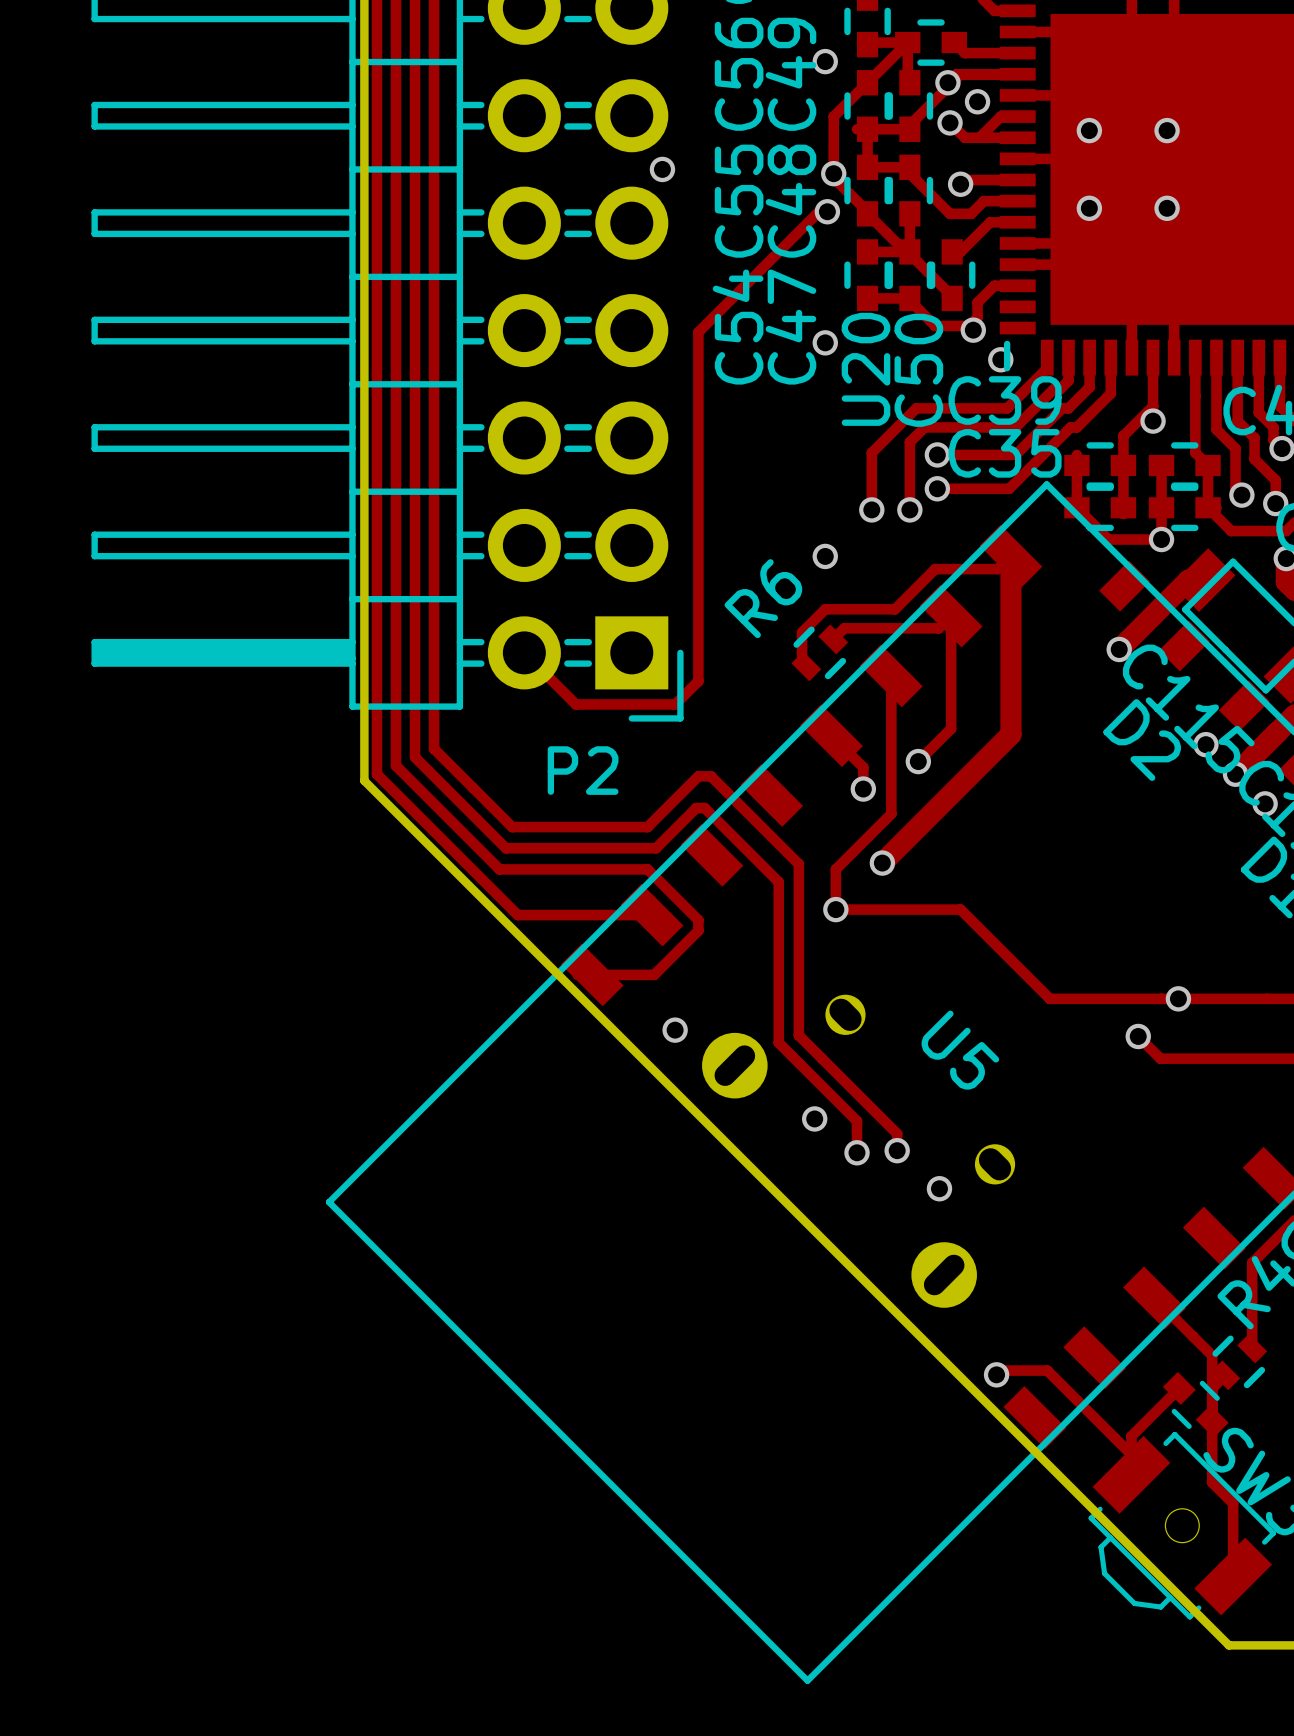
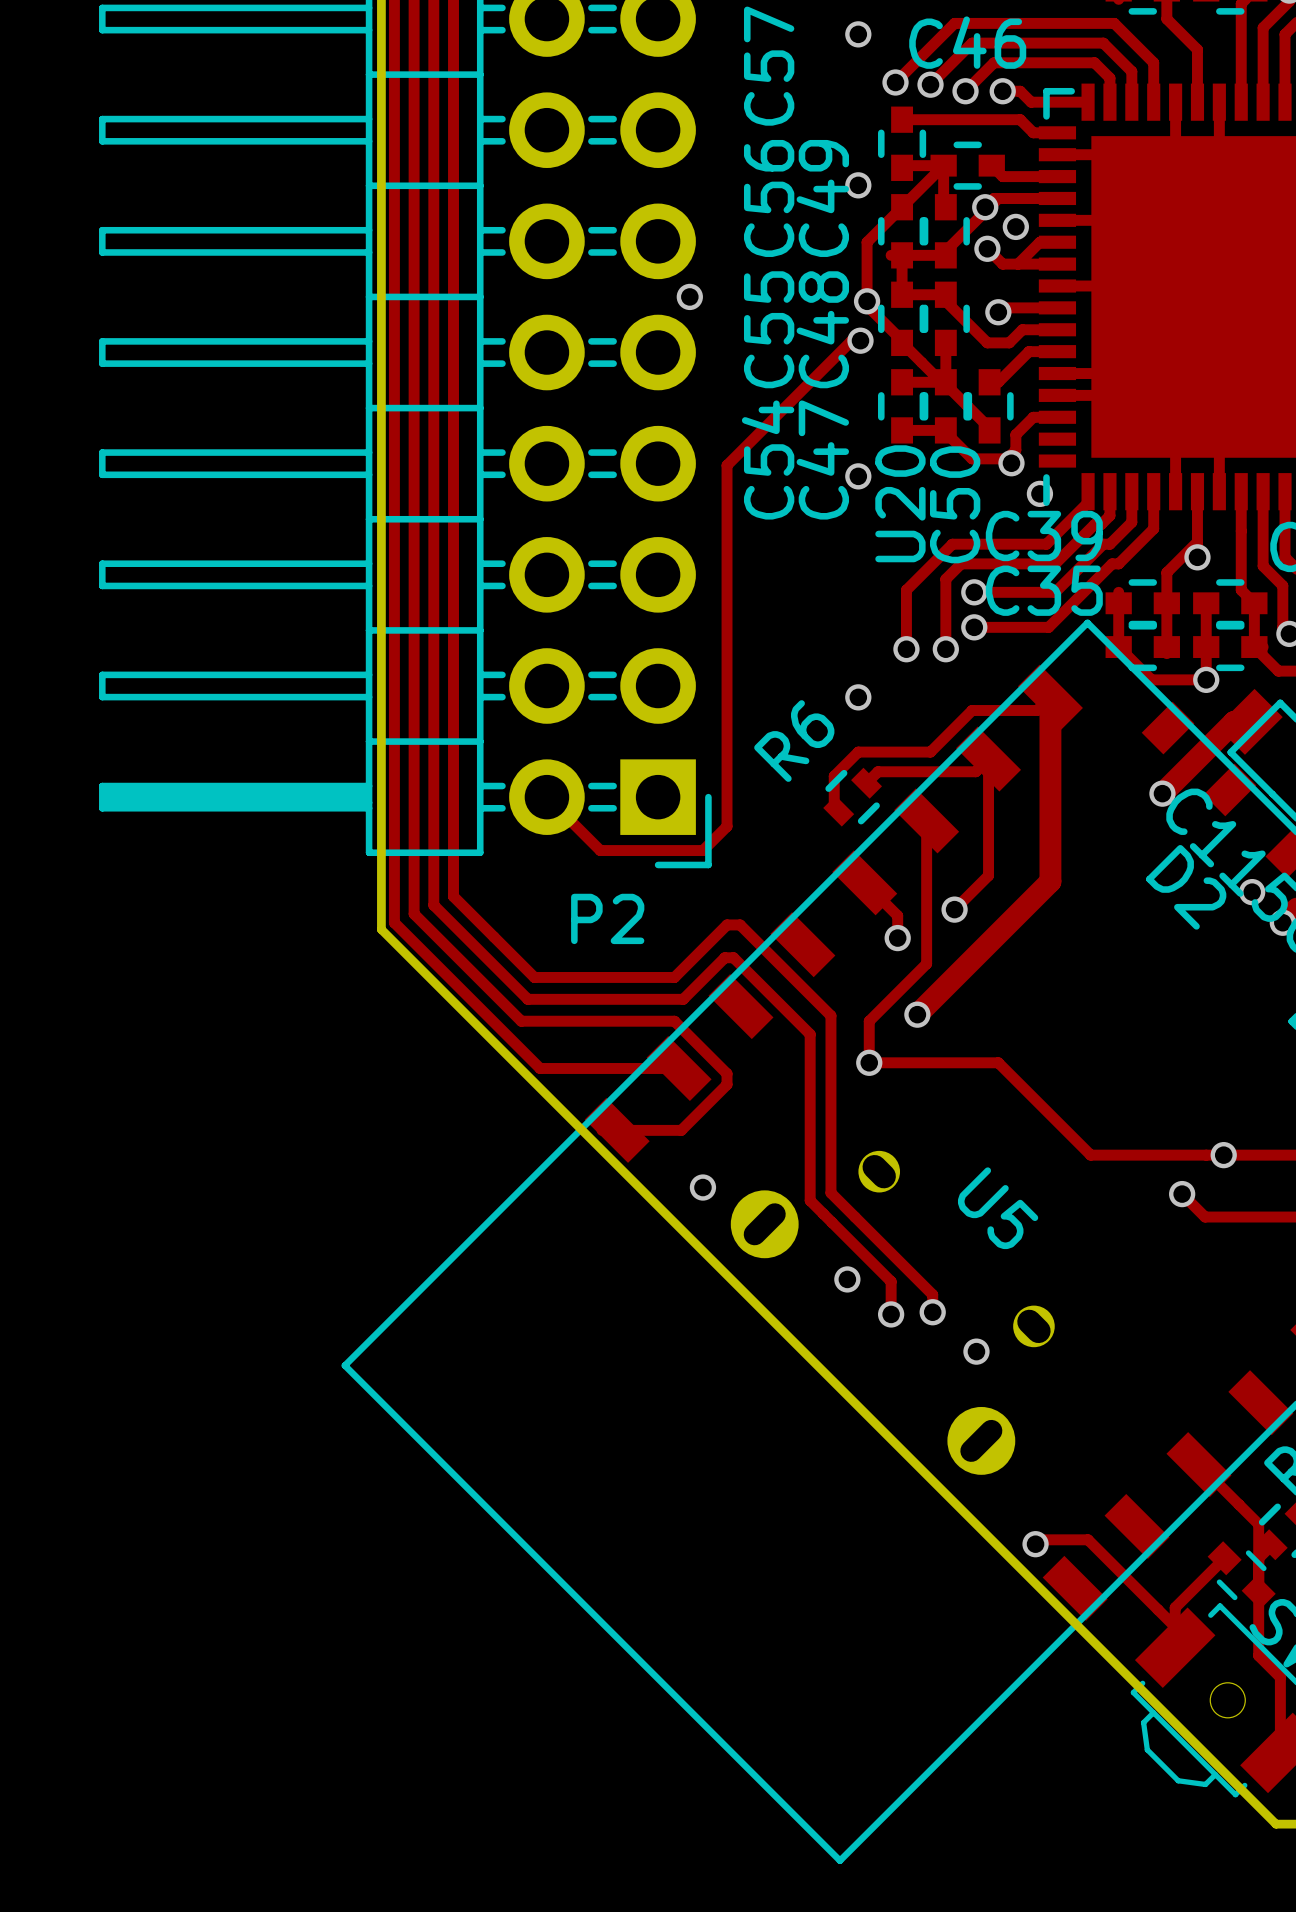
via: (1089, 130) -> none
via: (1167, 130) -> none
via: (1089, 208) -> none
via: (1167, 208) -> none

